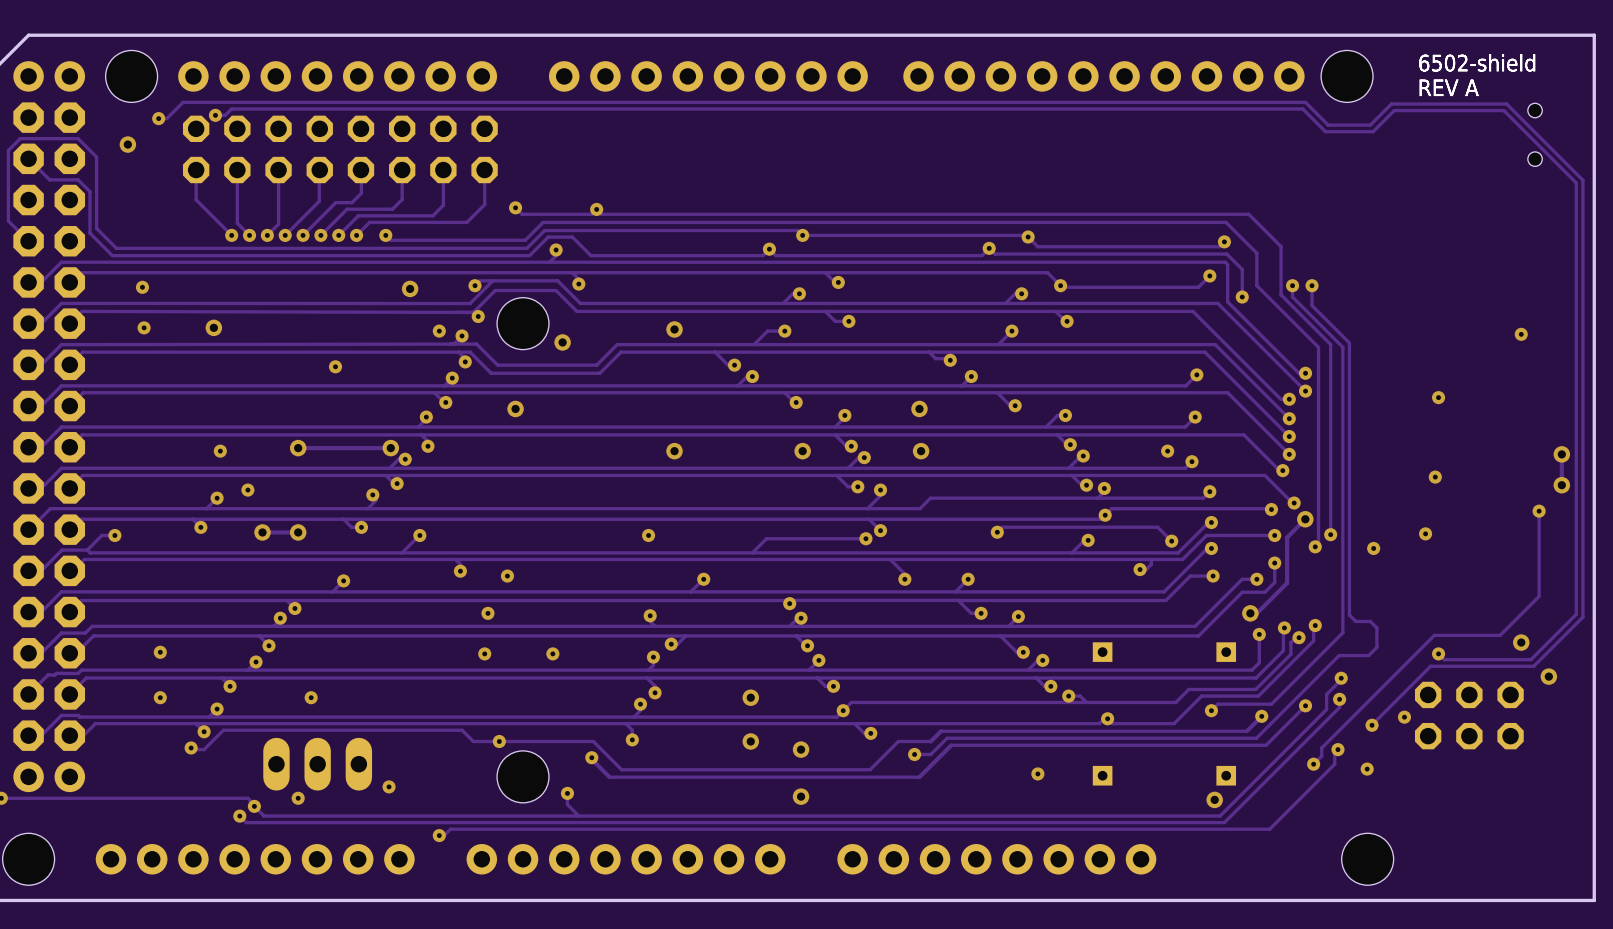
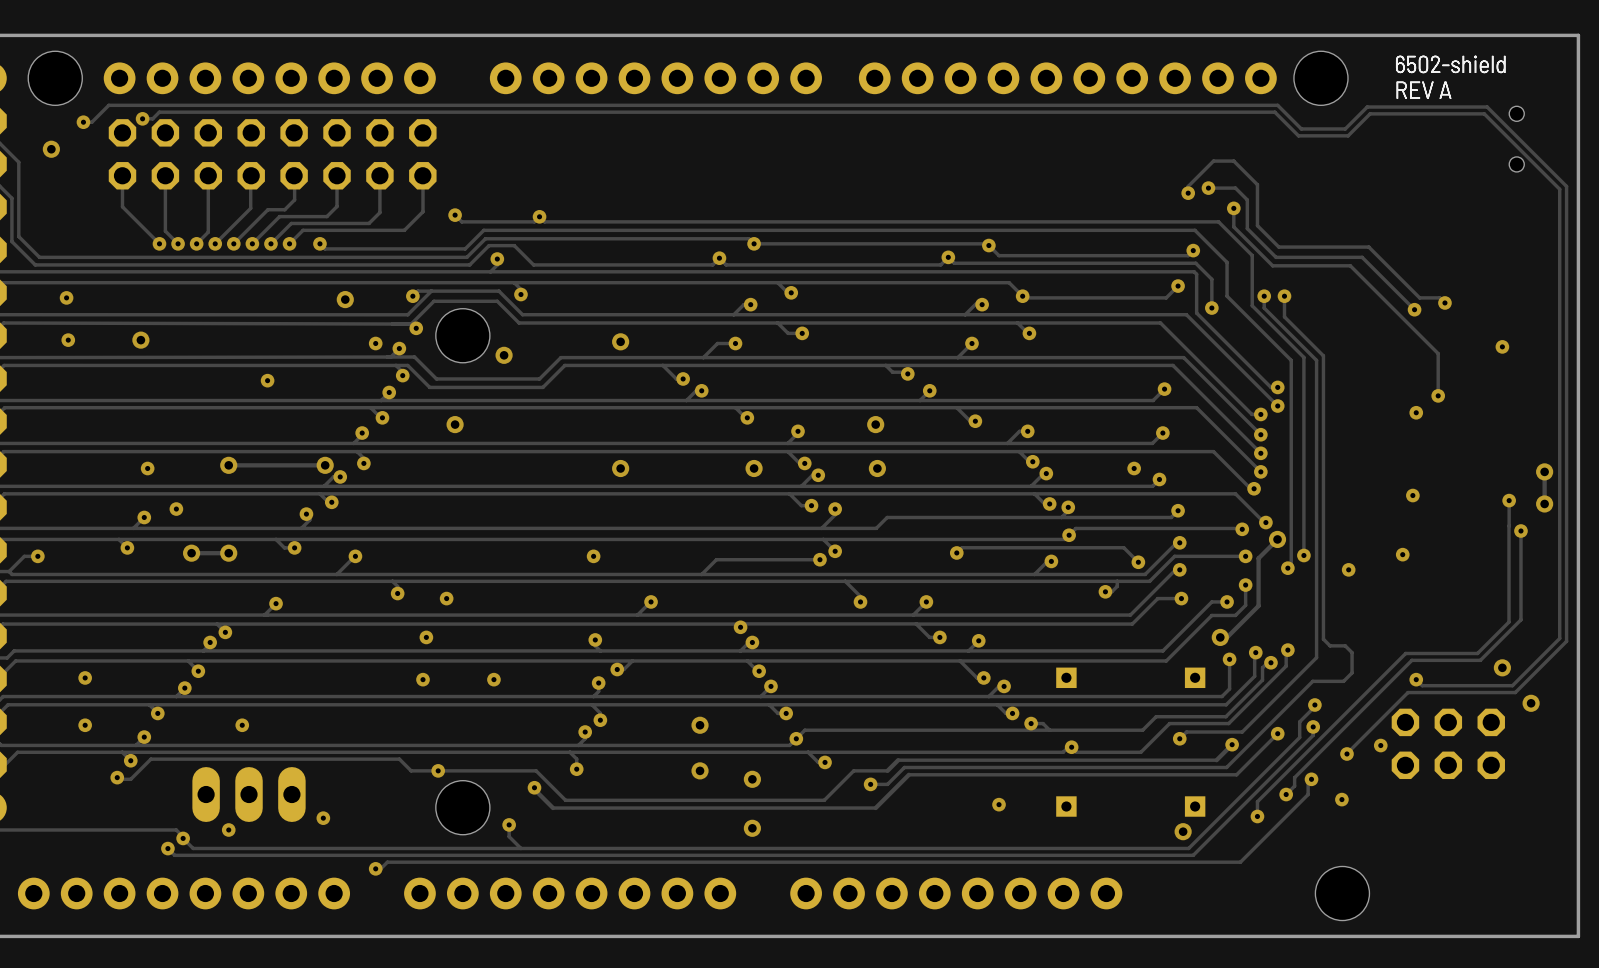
track: none -> (1208, 188) (1235, 188) (1247, 199) (1247, 228) (1276, 257) (1362, 257) (1414, 309)
via: none -> (1208, 188)
track: none -> (1188, 193) (1188, 186) (1213, 161) (1233, 161) (1257, 184) (1257, 225) (1278, 247) (1368, 247) (1419, 297) (1439, 297) (1444, 302)
via: none -> (1188, 193)
track: none -> (1233, 208) (1233, 226) (1272, 265) (1350, 265) (1438, 353) (1438, 395)
via: none -> (1233, 208)
via: none -> (1444, 302)
via: none -> (1414, 309)
via: none -> (1438, 395)
track: none -> (1509, 500) (1509, 525)
via: none -> (1509, 500)
track: none -> (1509, 526) (1509, 622) (1477, 653) (1405, 653) (1257, 801) (1257, 816)
via: none -> (1257, 816)

